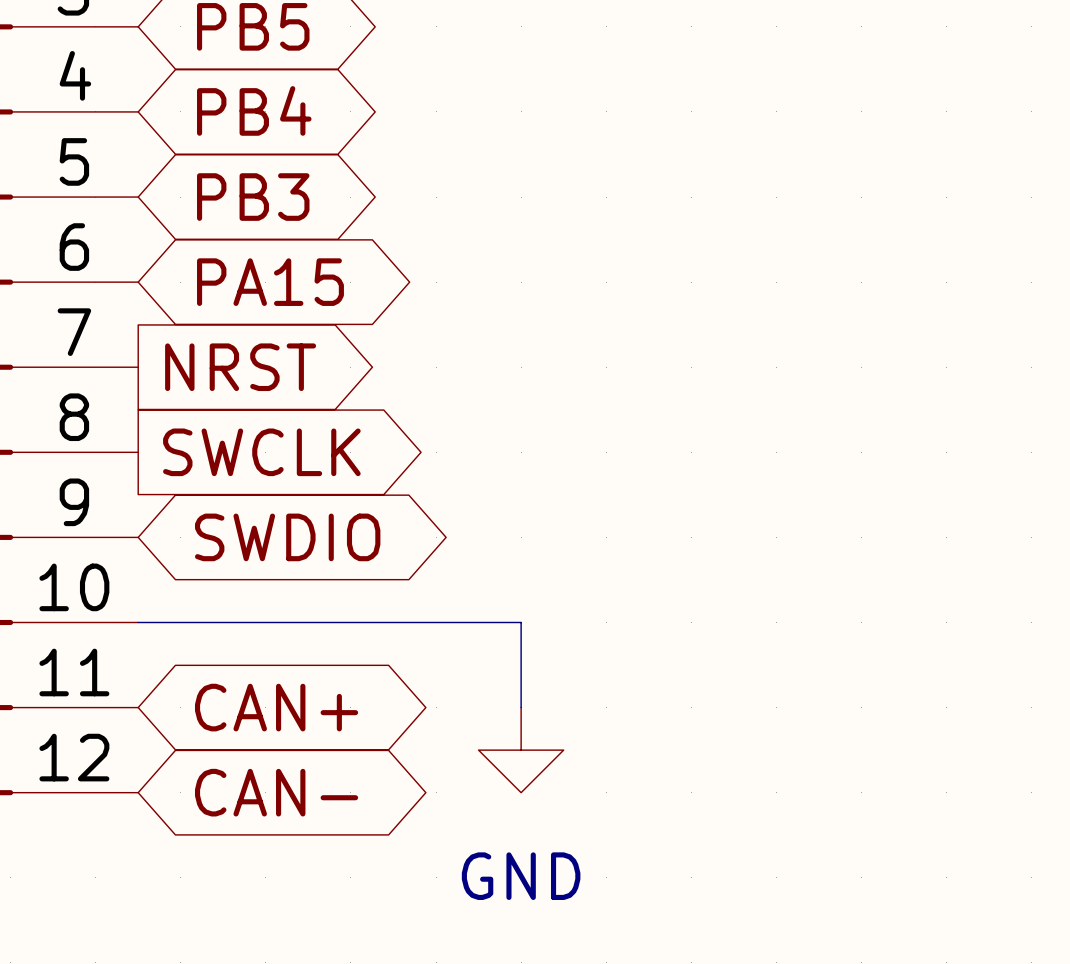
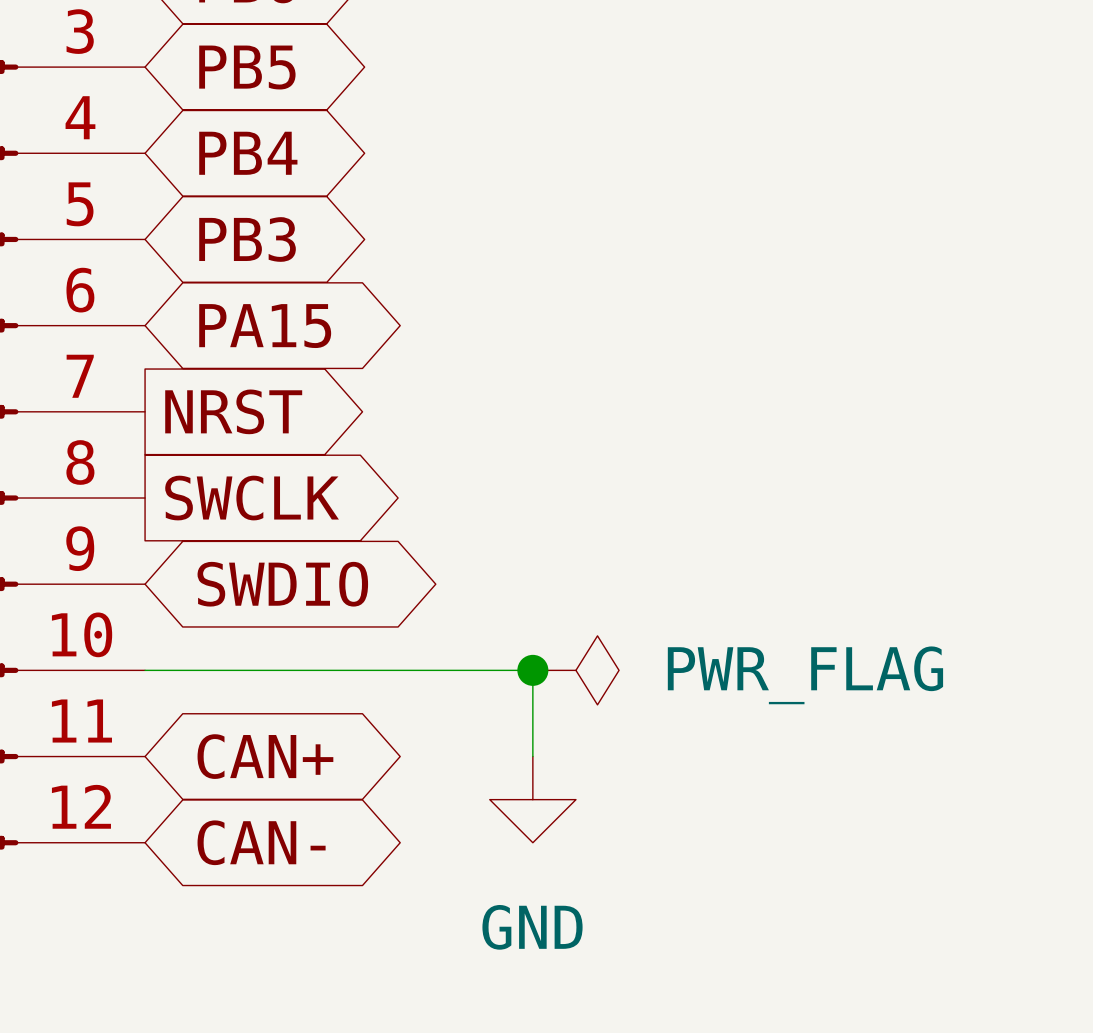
junction: none -> (532, 670)
power symbol: none -> PWR_FLAG (575, 670)

